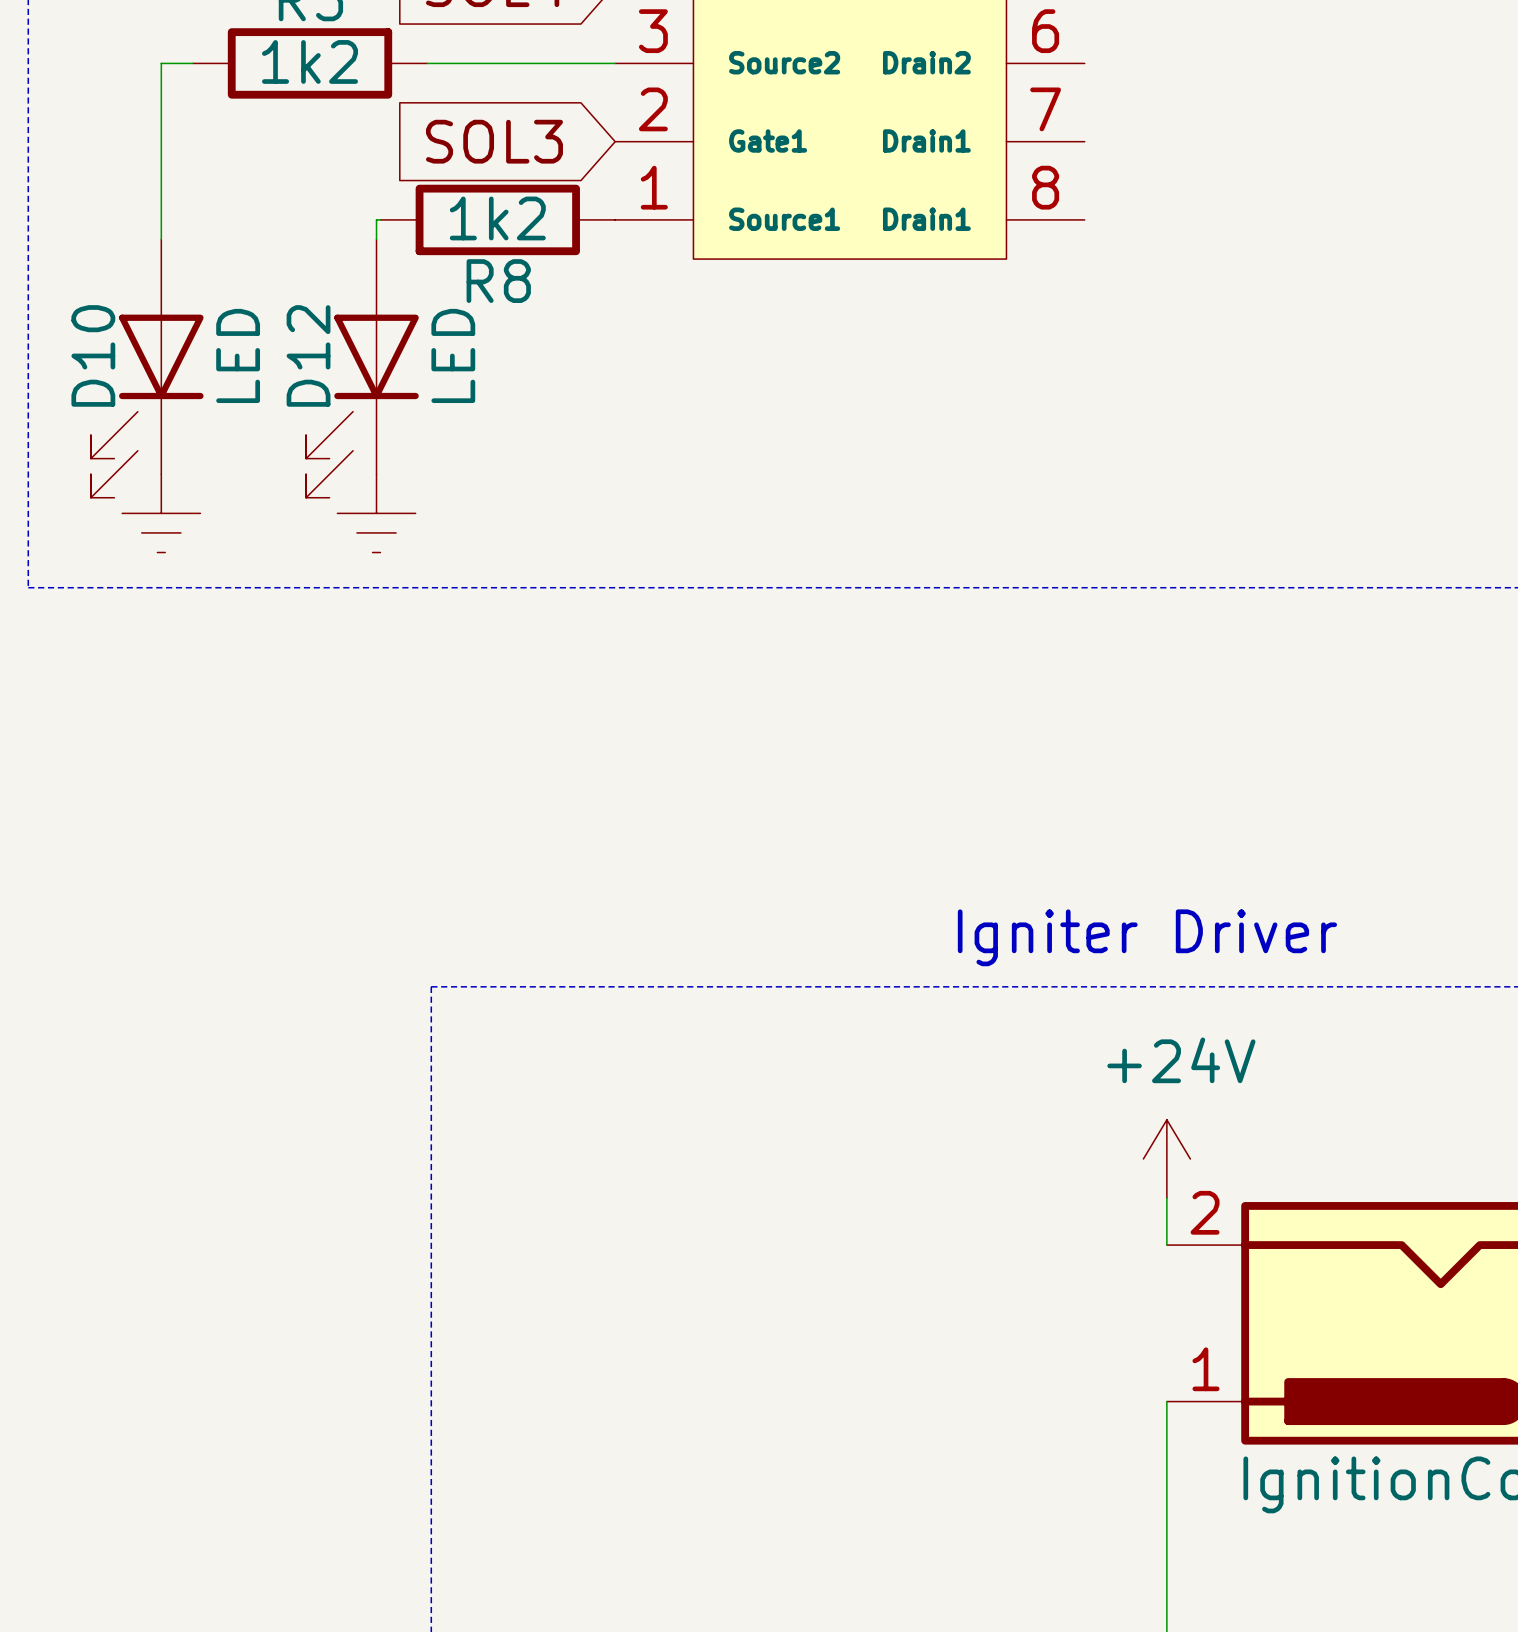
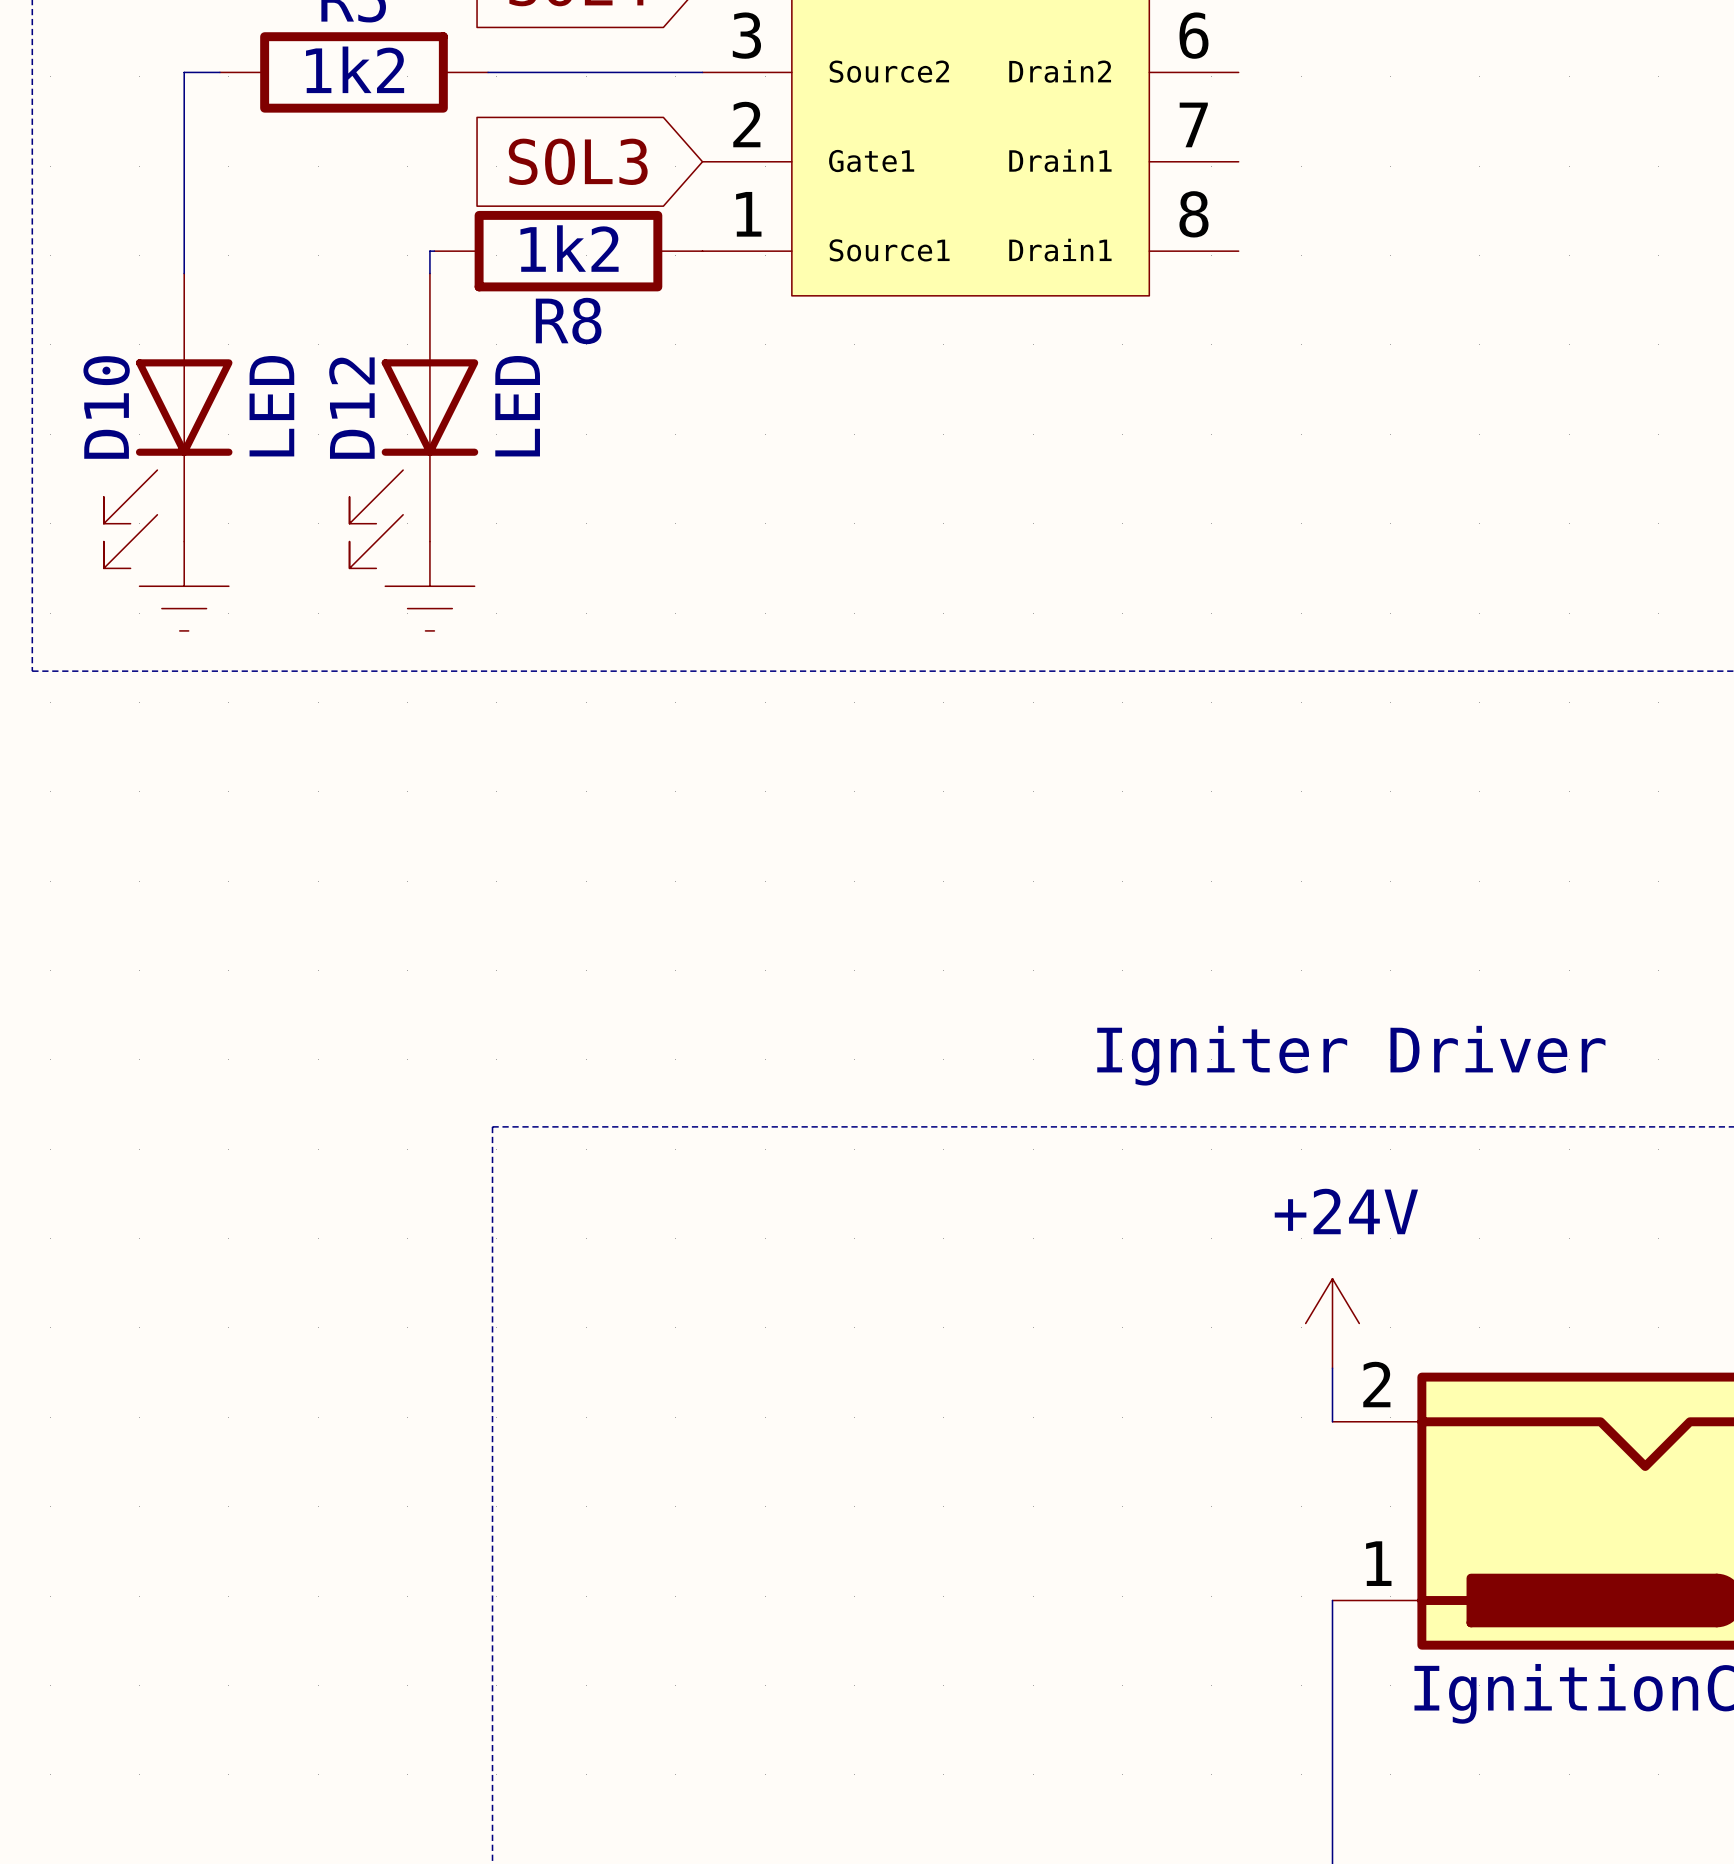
text position: Igniter Driver (1147, 937) -> Igniter Driver (1351, 1055)

